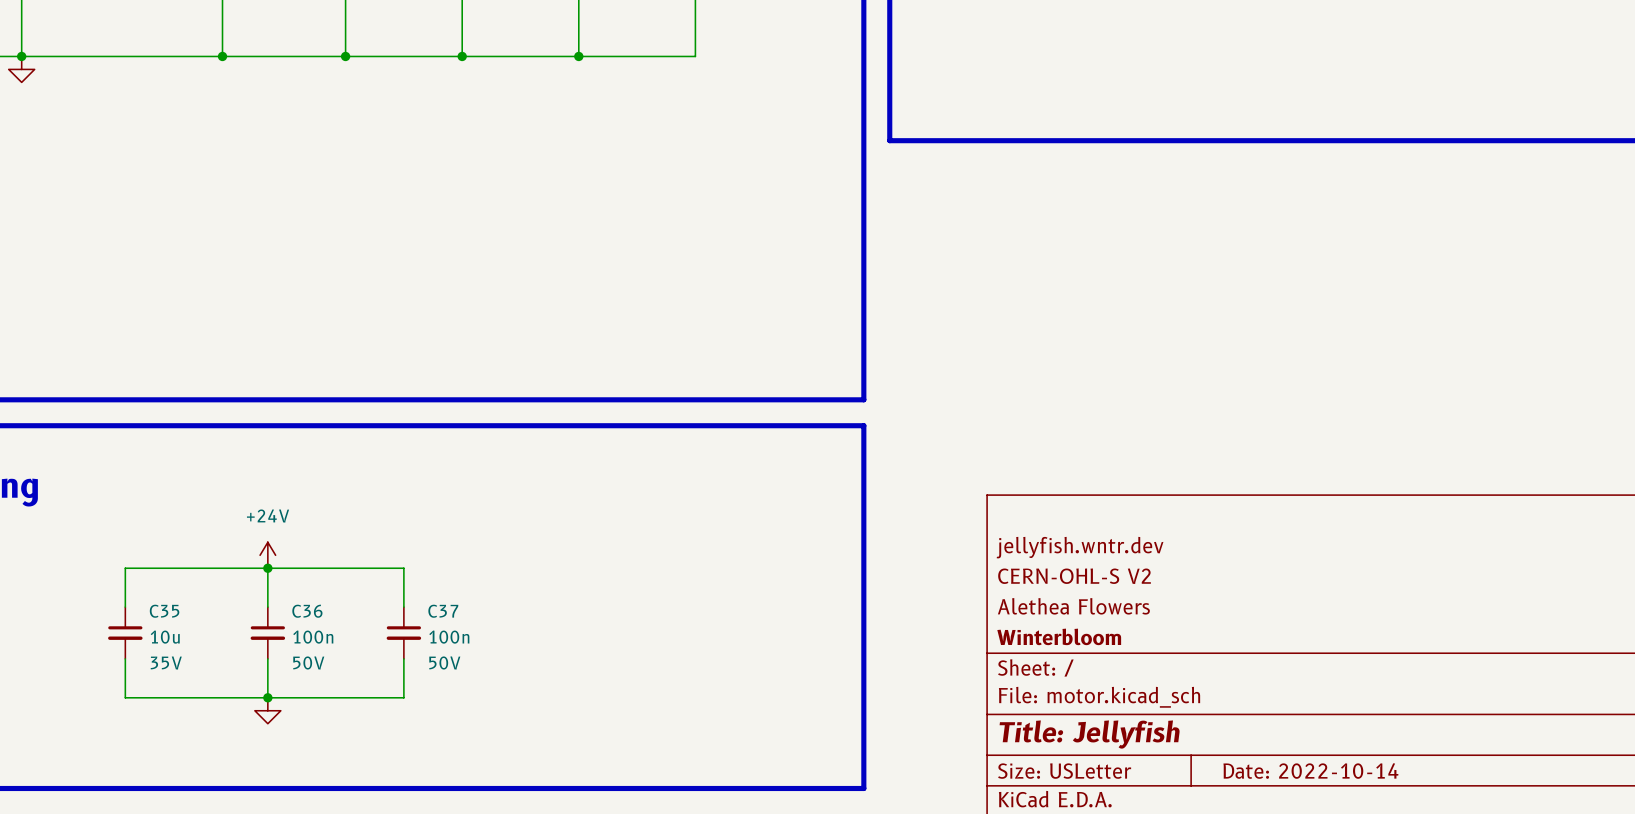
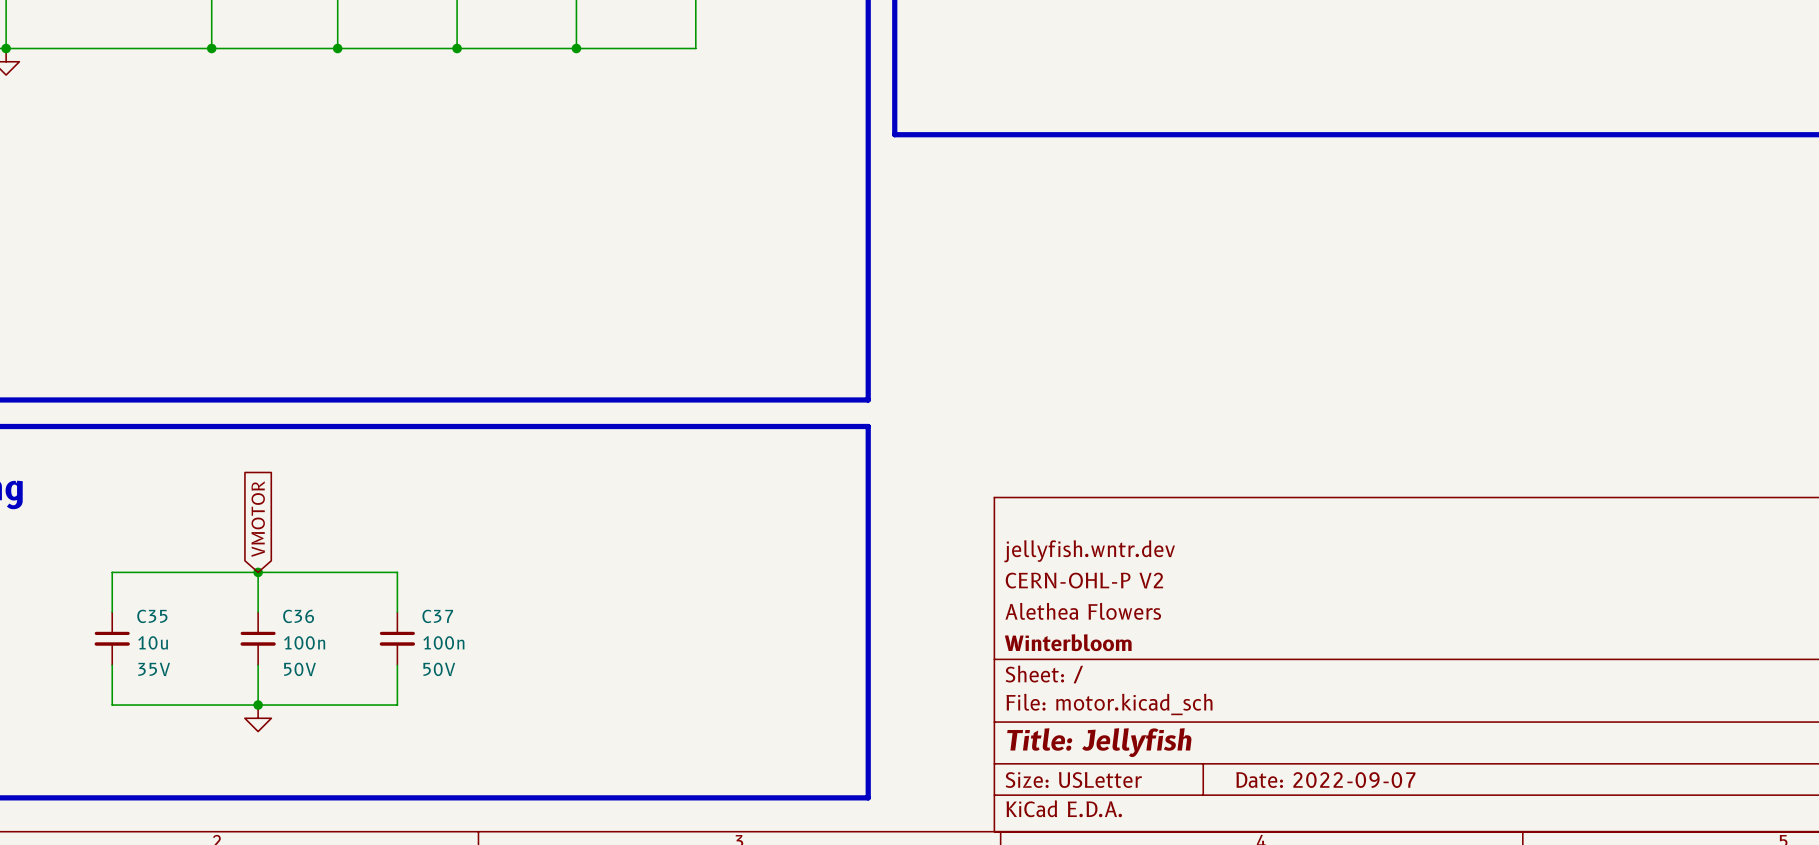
global label: none -> VMOTOR (258, 519)
power symbol: +24V (267, 555) -> none
title block: CERN-OHL-S V2 (1074, 576) -> CERN-OHL-P V2 (1084, 580)
title block: Date: 2022-10-14 (1310, 771) -> Date: 2022-09-07 (1325, 780)

